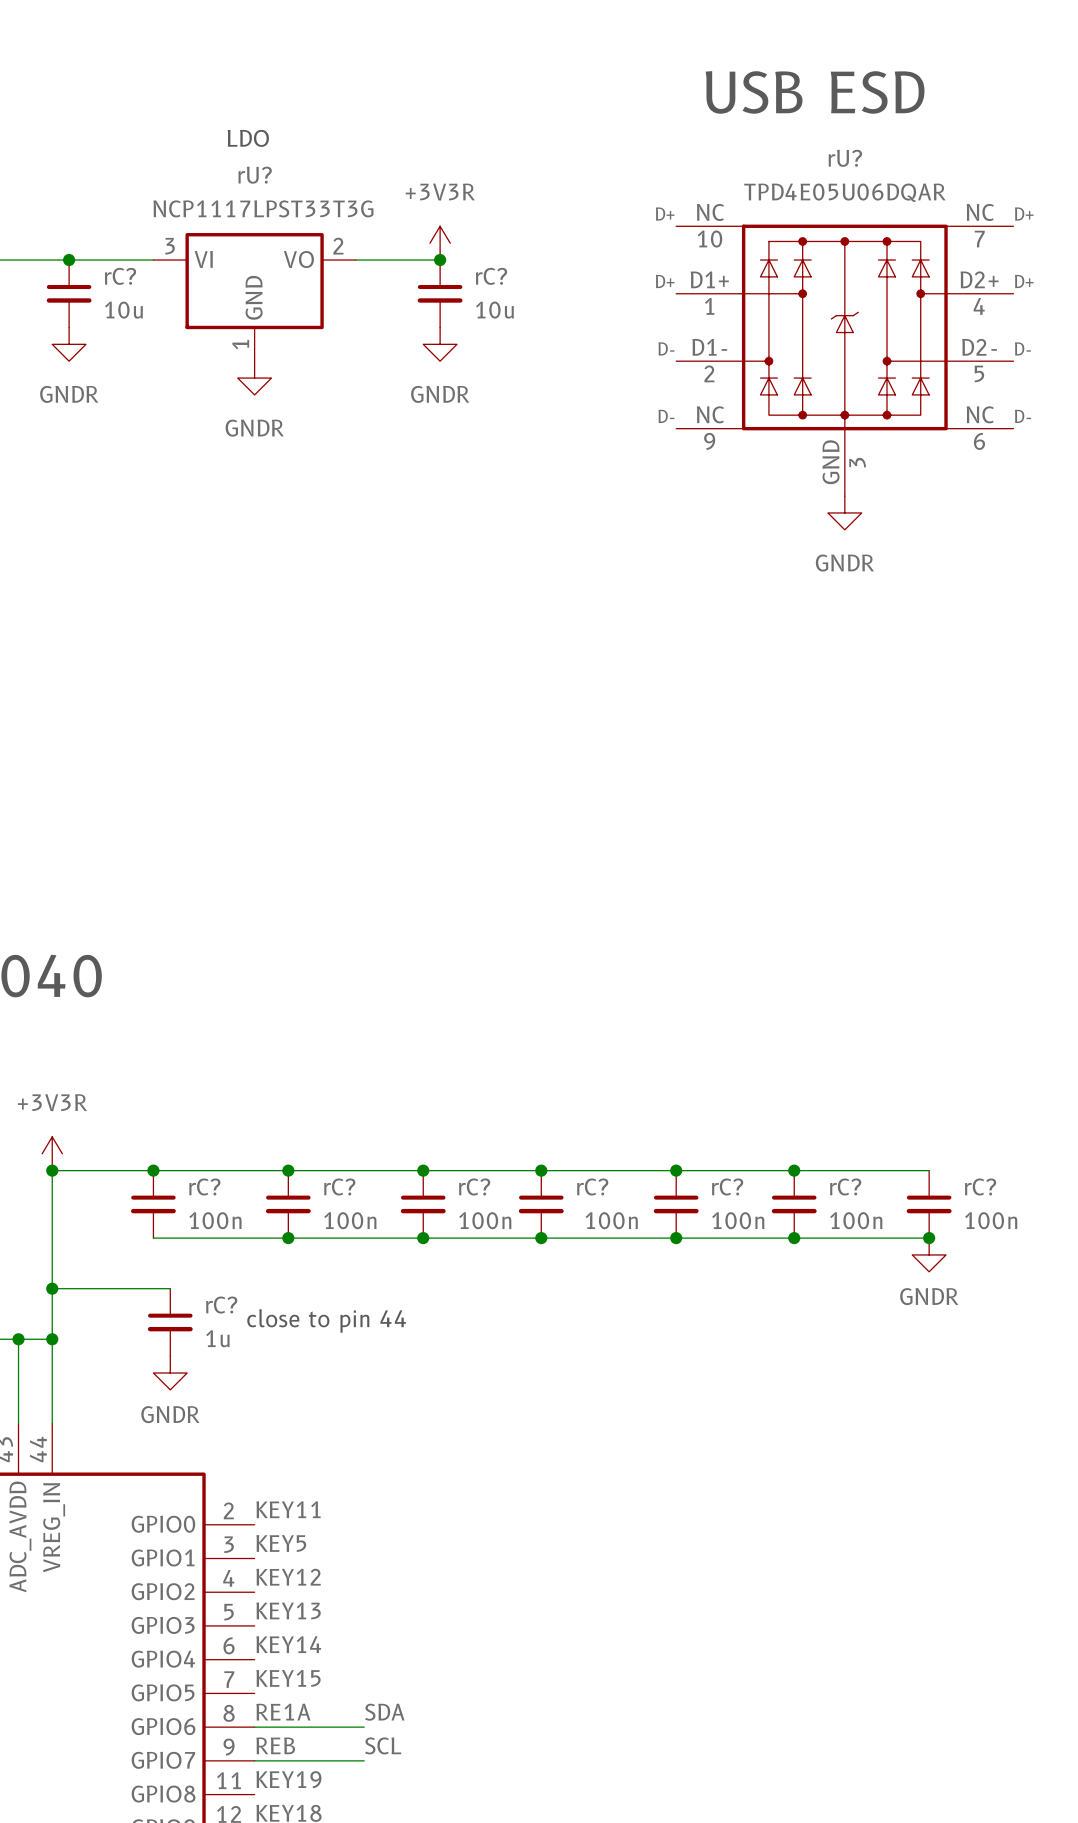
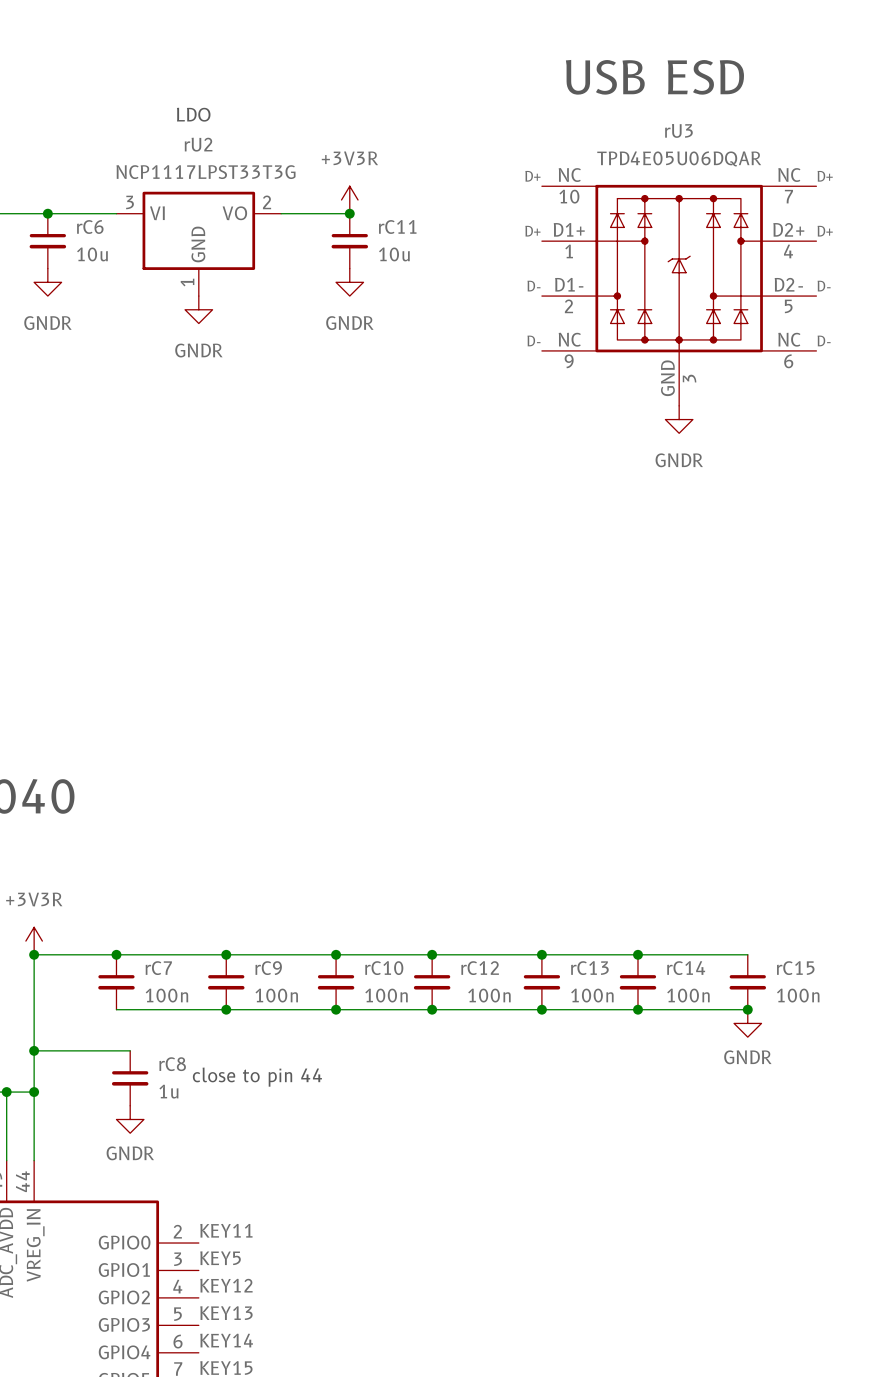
rU? name: rU? (845, 158) -> rU3 (678, 130)
rU? name: rU? (255, 175) -> rU2 (198, 144)
rC? name: rC? (120, 276) -> rC6 (90, 227)
rC? name: rC? (491, 276) -> rC11 (397, 226)
rC? name: rC? (204, 1186) -> rC7 (158, 968)
rC? name: rC? (339, 1186) -> rC9 (268, 968)
rC? name: rC? (474, 1186) -> rC10 (384, 968)
rC? name: rC? (592, 1186) -> rC12 (480, 968)
rC? name: rC? (727, 1186) -> rC13 (589, 968)
rC? name: rC? (845, 1186) -> rC14 (686, 968)
rC? name: rC? (980, 1186) -> rC15 (795, 968)
rC? name: rC? (221, 1305) -> rC8 (172, 1064)

